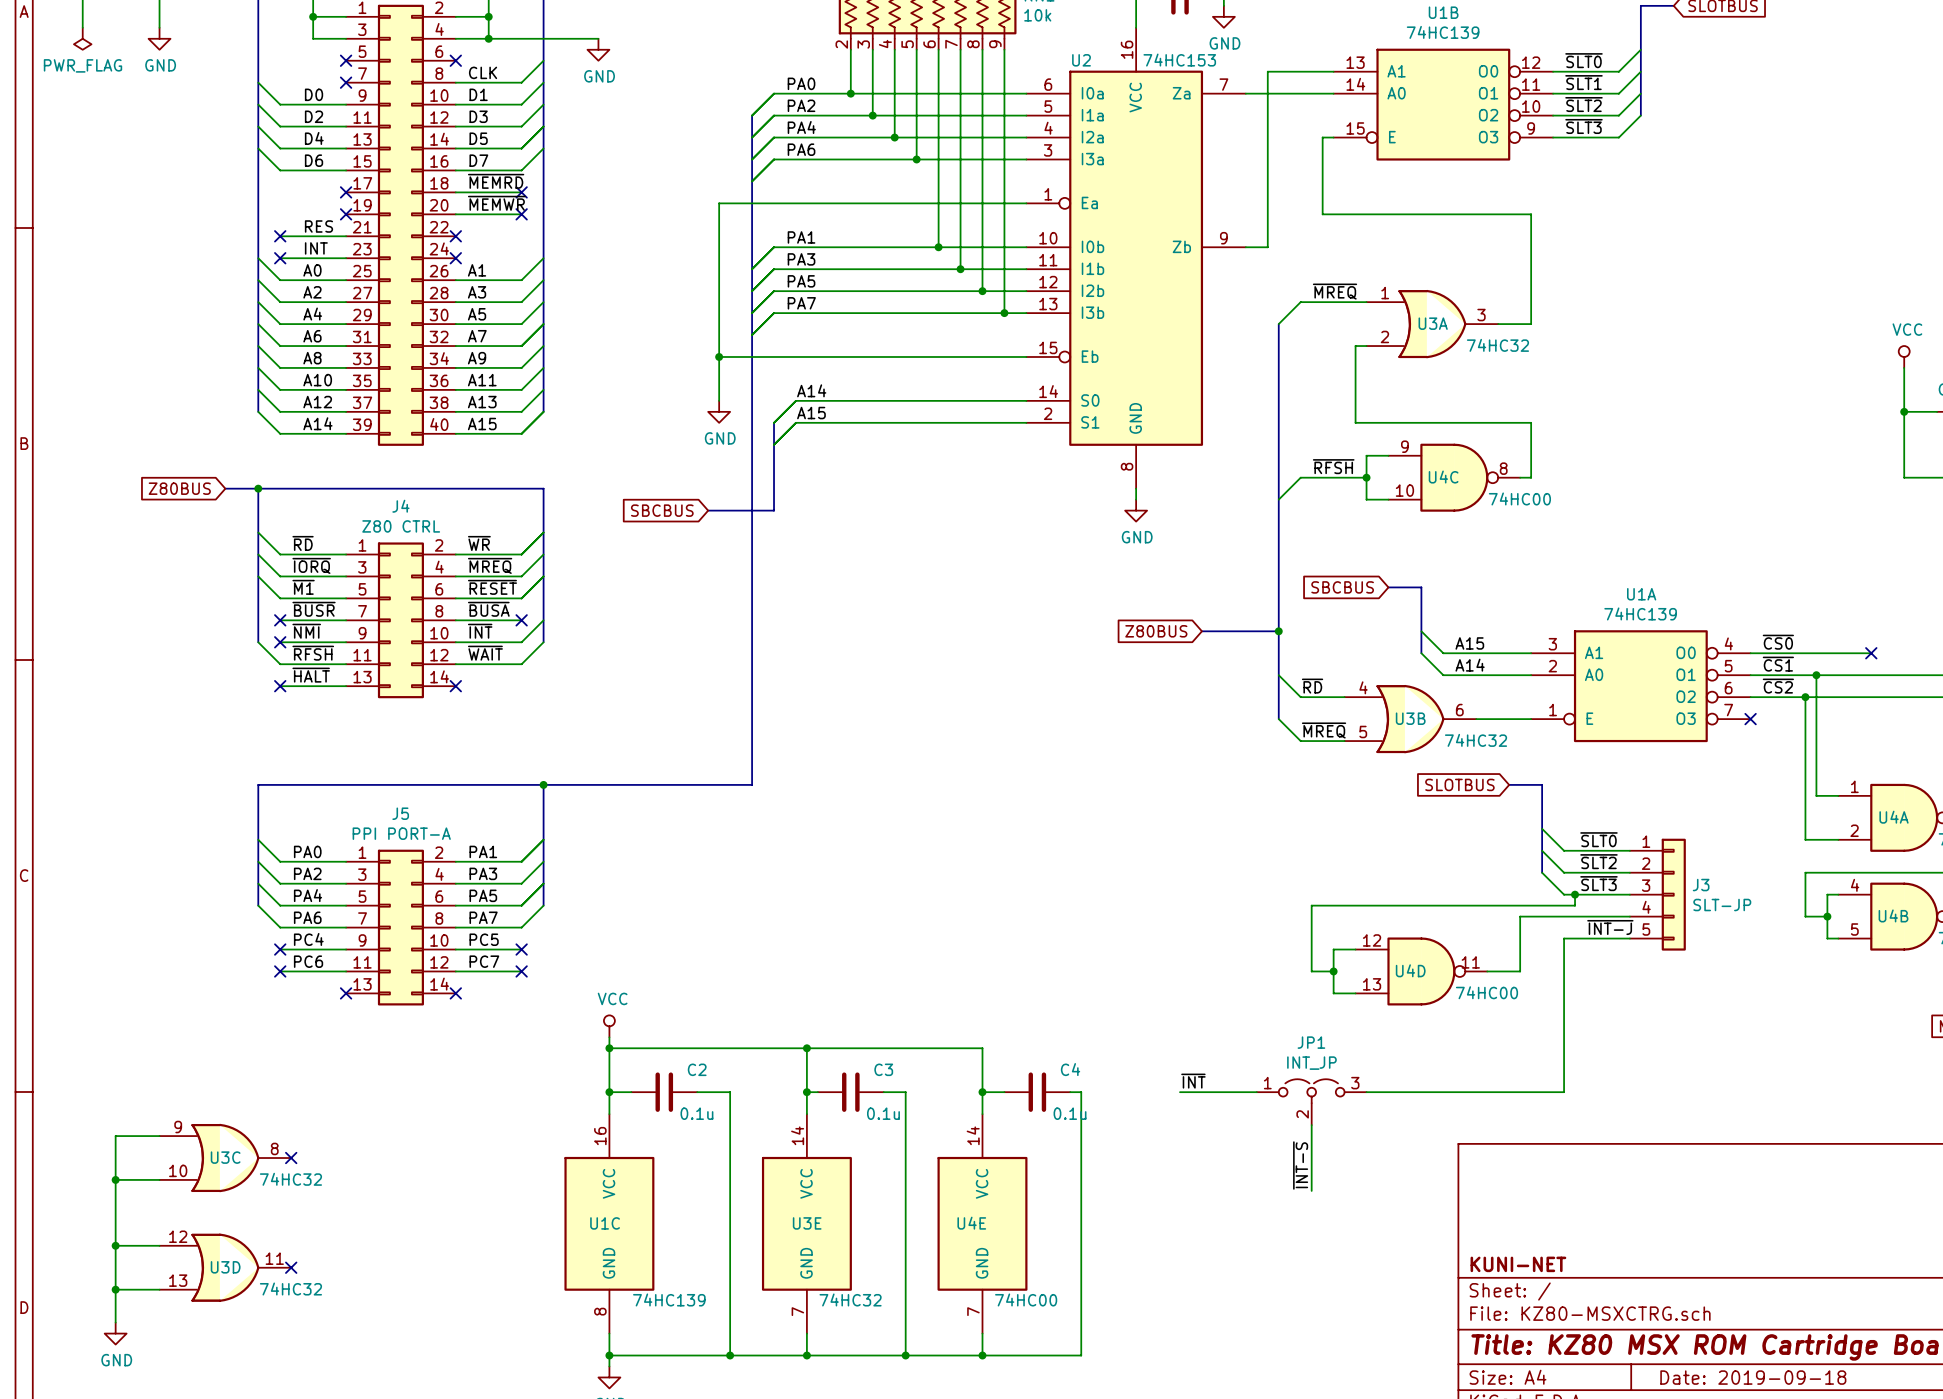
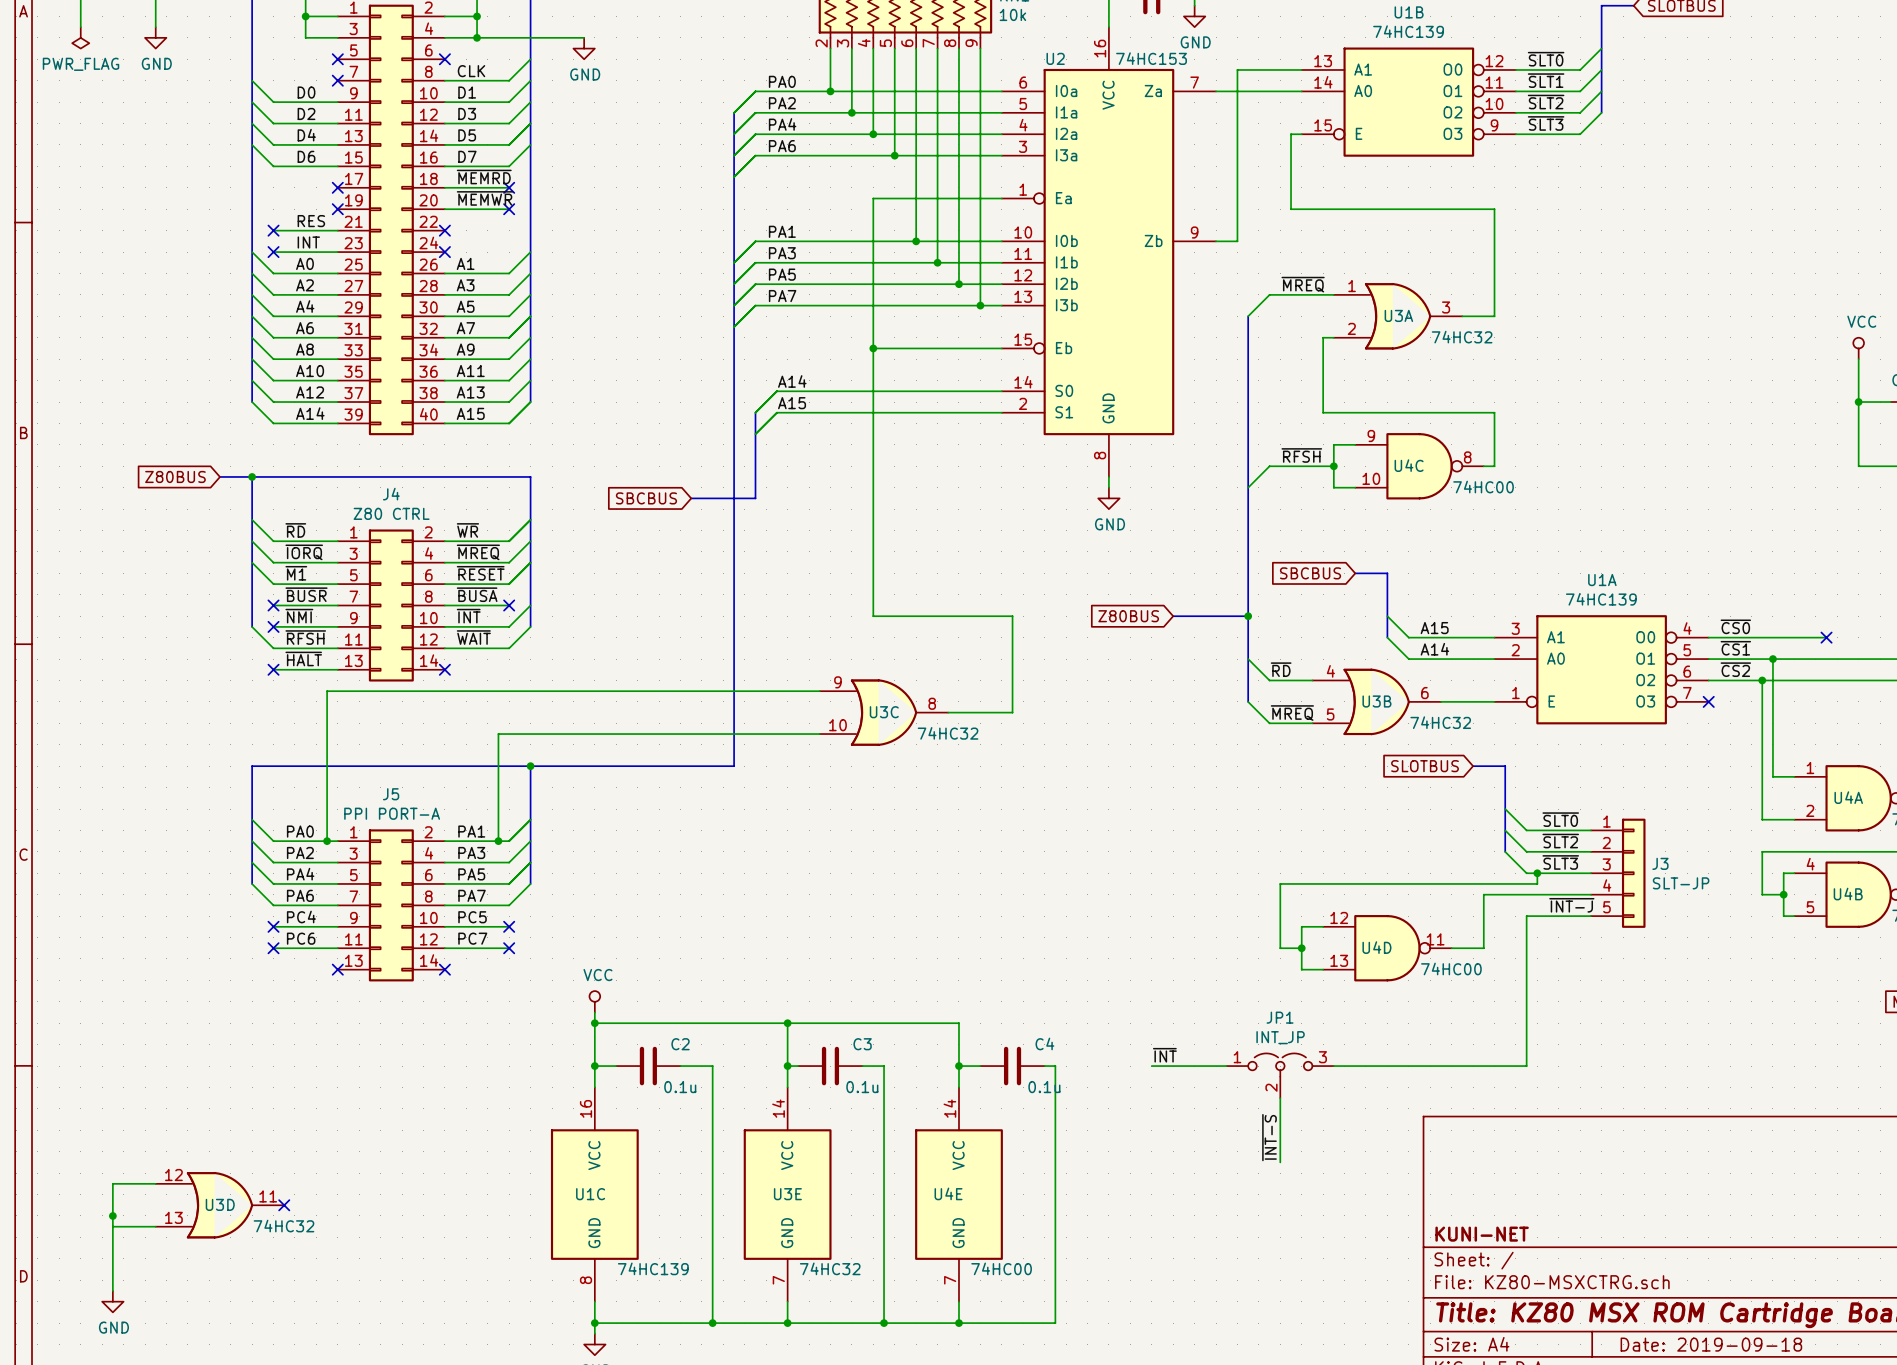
wire: (894, 203) (719, 203) (719, 400) -> (873, 198) (873, 616) (1012, 616) (1012, 712) (948, 712)
wire: (719, 356) (894, 356) -> none
junction: (719, 356) -> none
junction: none -> (873, 348)
power symbol: GND (719, 411) -> none
wire: none -> (819, 691) (327, 691) (327, 841)
wire: none -> (819, 734) (498, 734) (498, 841)
junction: none -> (327, 841)
junction: none -> (498, 841)
wire: (159, 1136) (115, 1136) (115, 1212) -> (155, 1183) (112, 1183)
U3C position: (225, 1158) -> (884, 712)
no-connect mark: (291, 1158) -> none
wire: (115, 1179) (159, 1179) -> none
junction: (115, 1179) -> none
wire: (115, 1245) (159, 1245) -> none
U3D position: (225, 1267) -> (219, 1205)
no-connect mark position: (291, 1267) -> (284, 1205)
wire: (115, 1289) (159, 1289) -> (112, 1226) (155, 1226)
junction: (115, 1289) -> none

